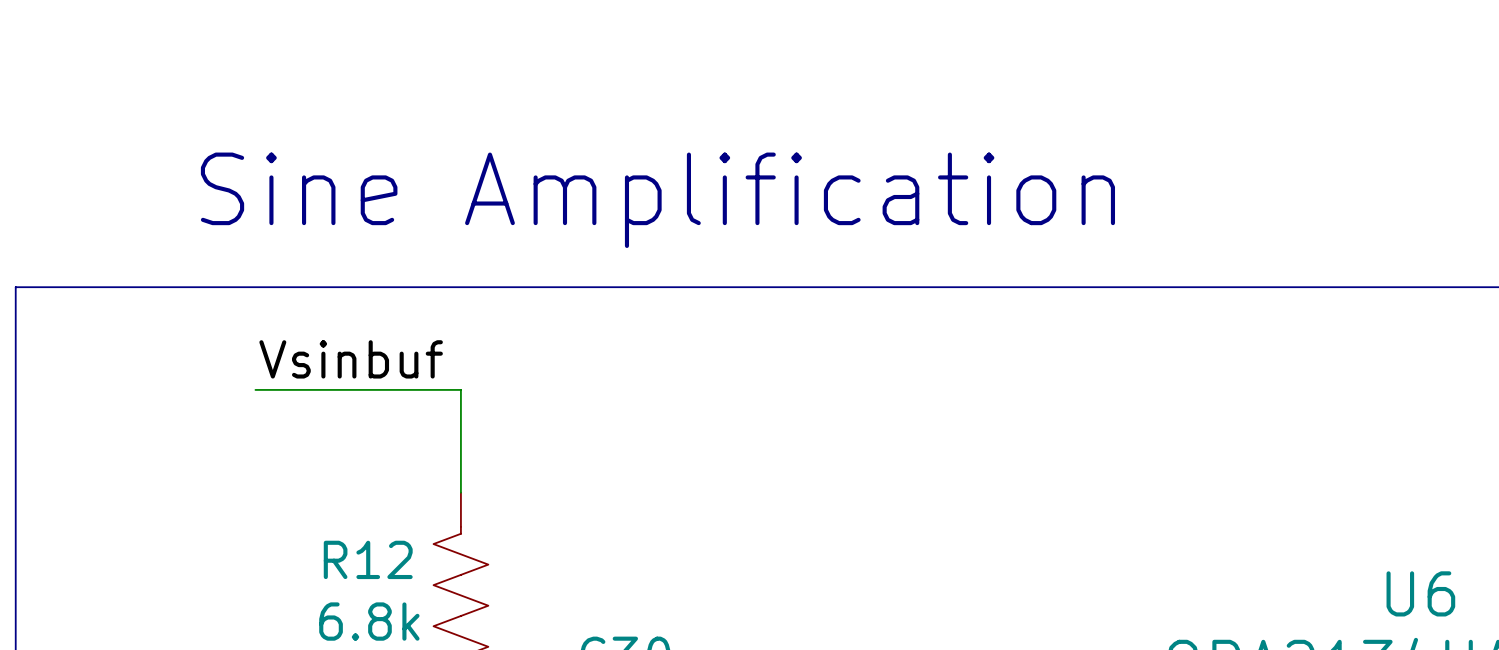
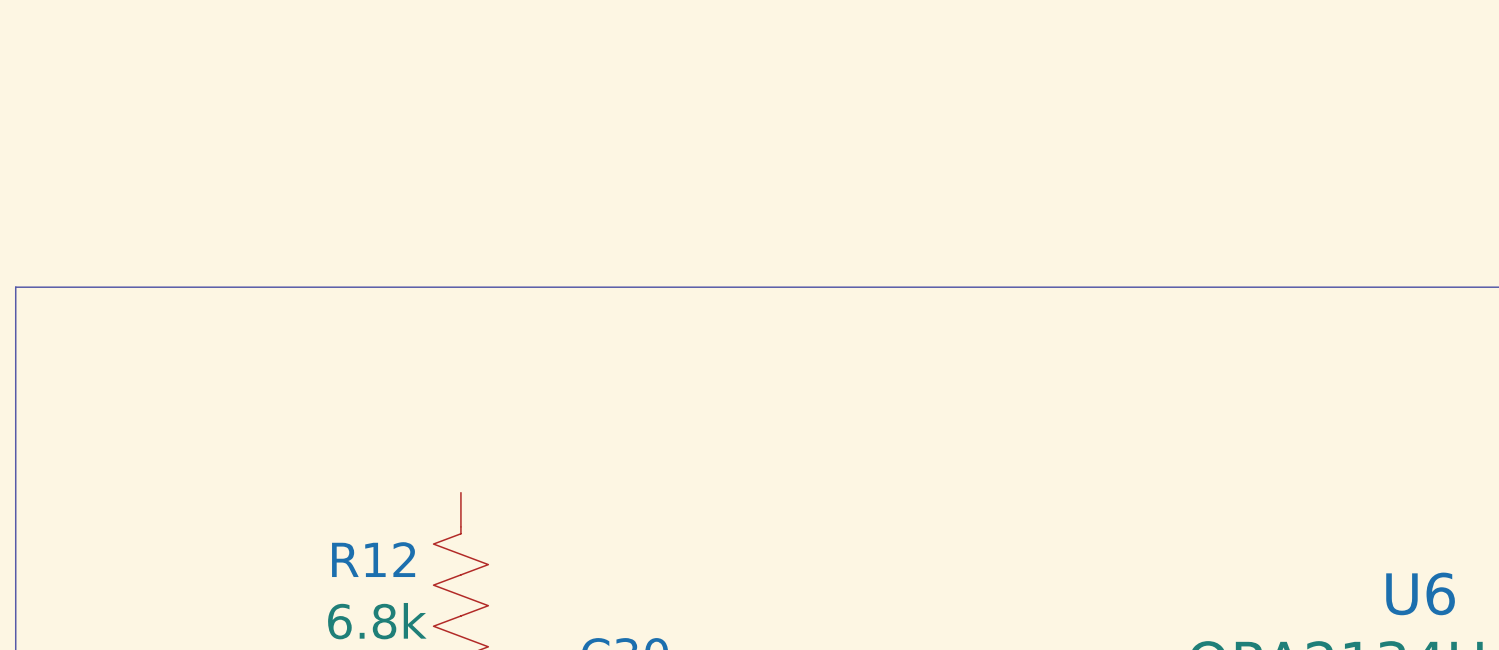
text: Sine Amplification (657, 200) -> none
label: Vsinbuf (351, 359) -> none
wire: (255, 389) (460, 389) (460, 492) -> none

